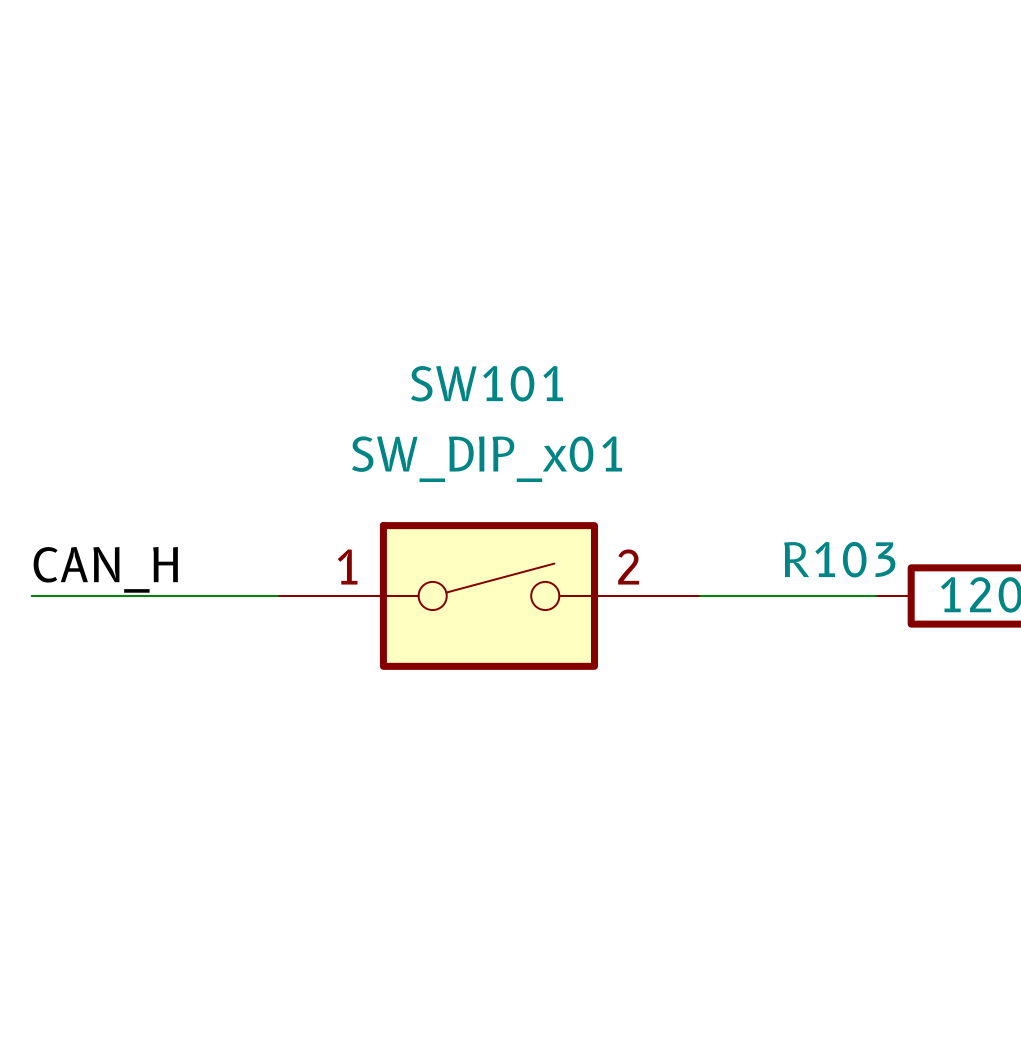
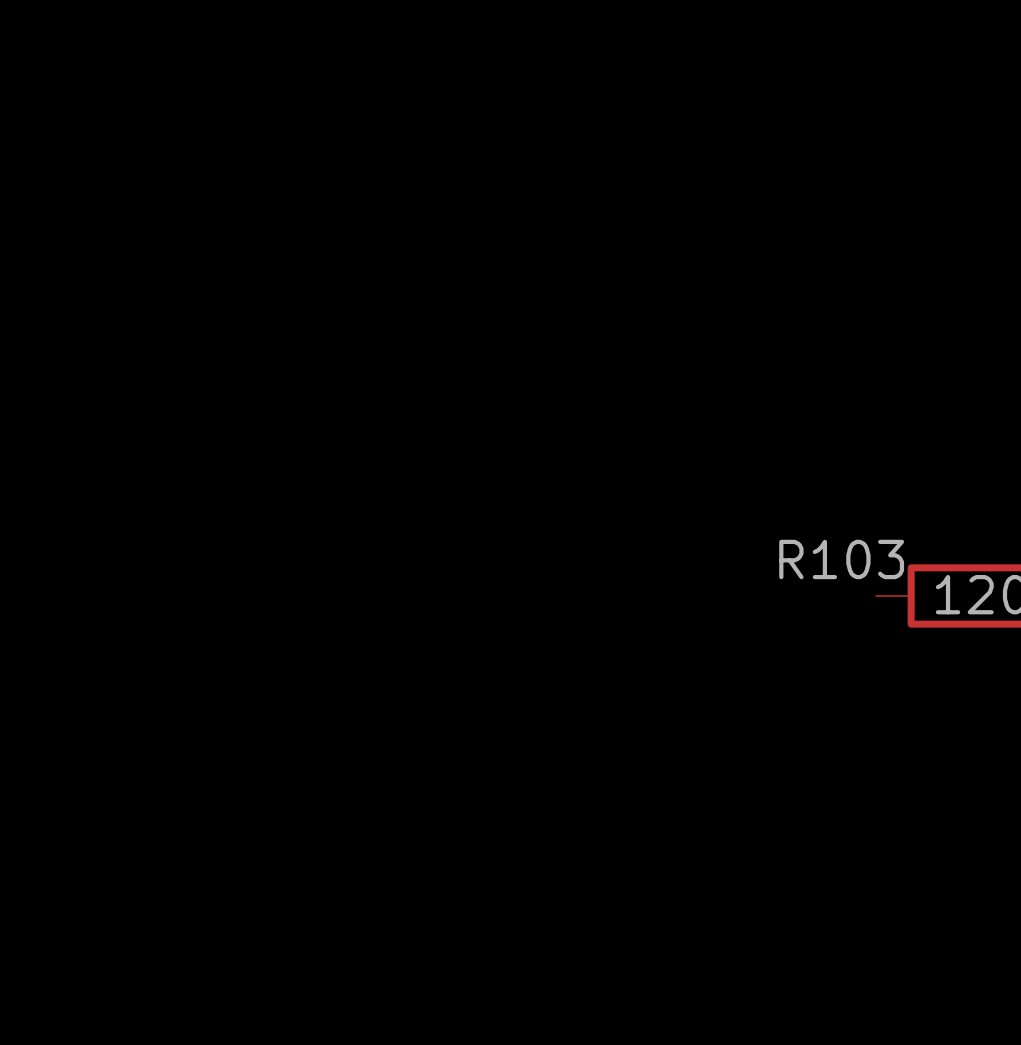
label: CAN_H (105, 569) -> none
wire: (31, 595) (277, 595) -> none
SW101: SW_DIP_x01 (488, 595) -> none
wire: (700, 595) (875, 595) -> none

